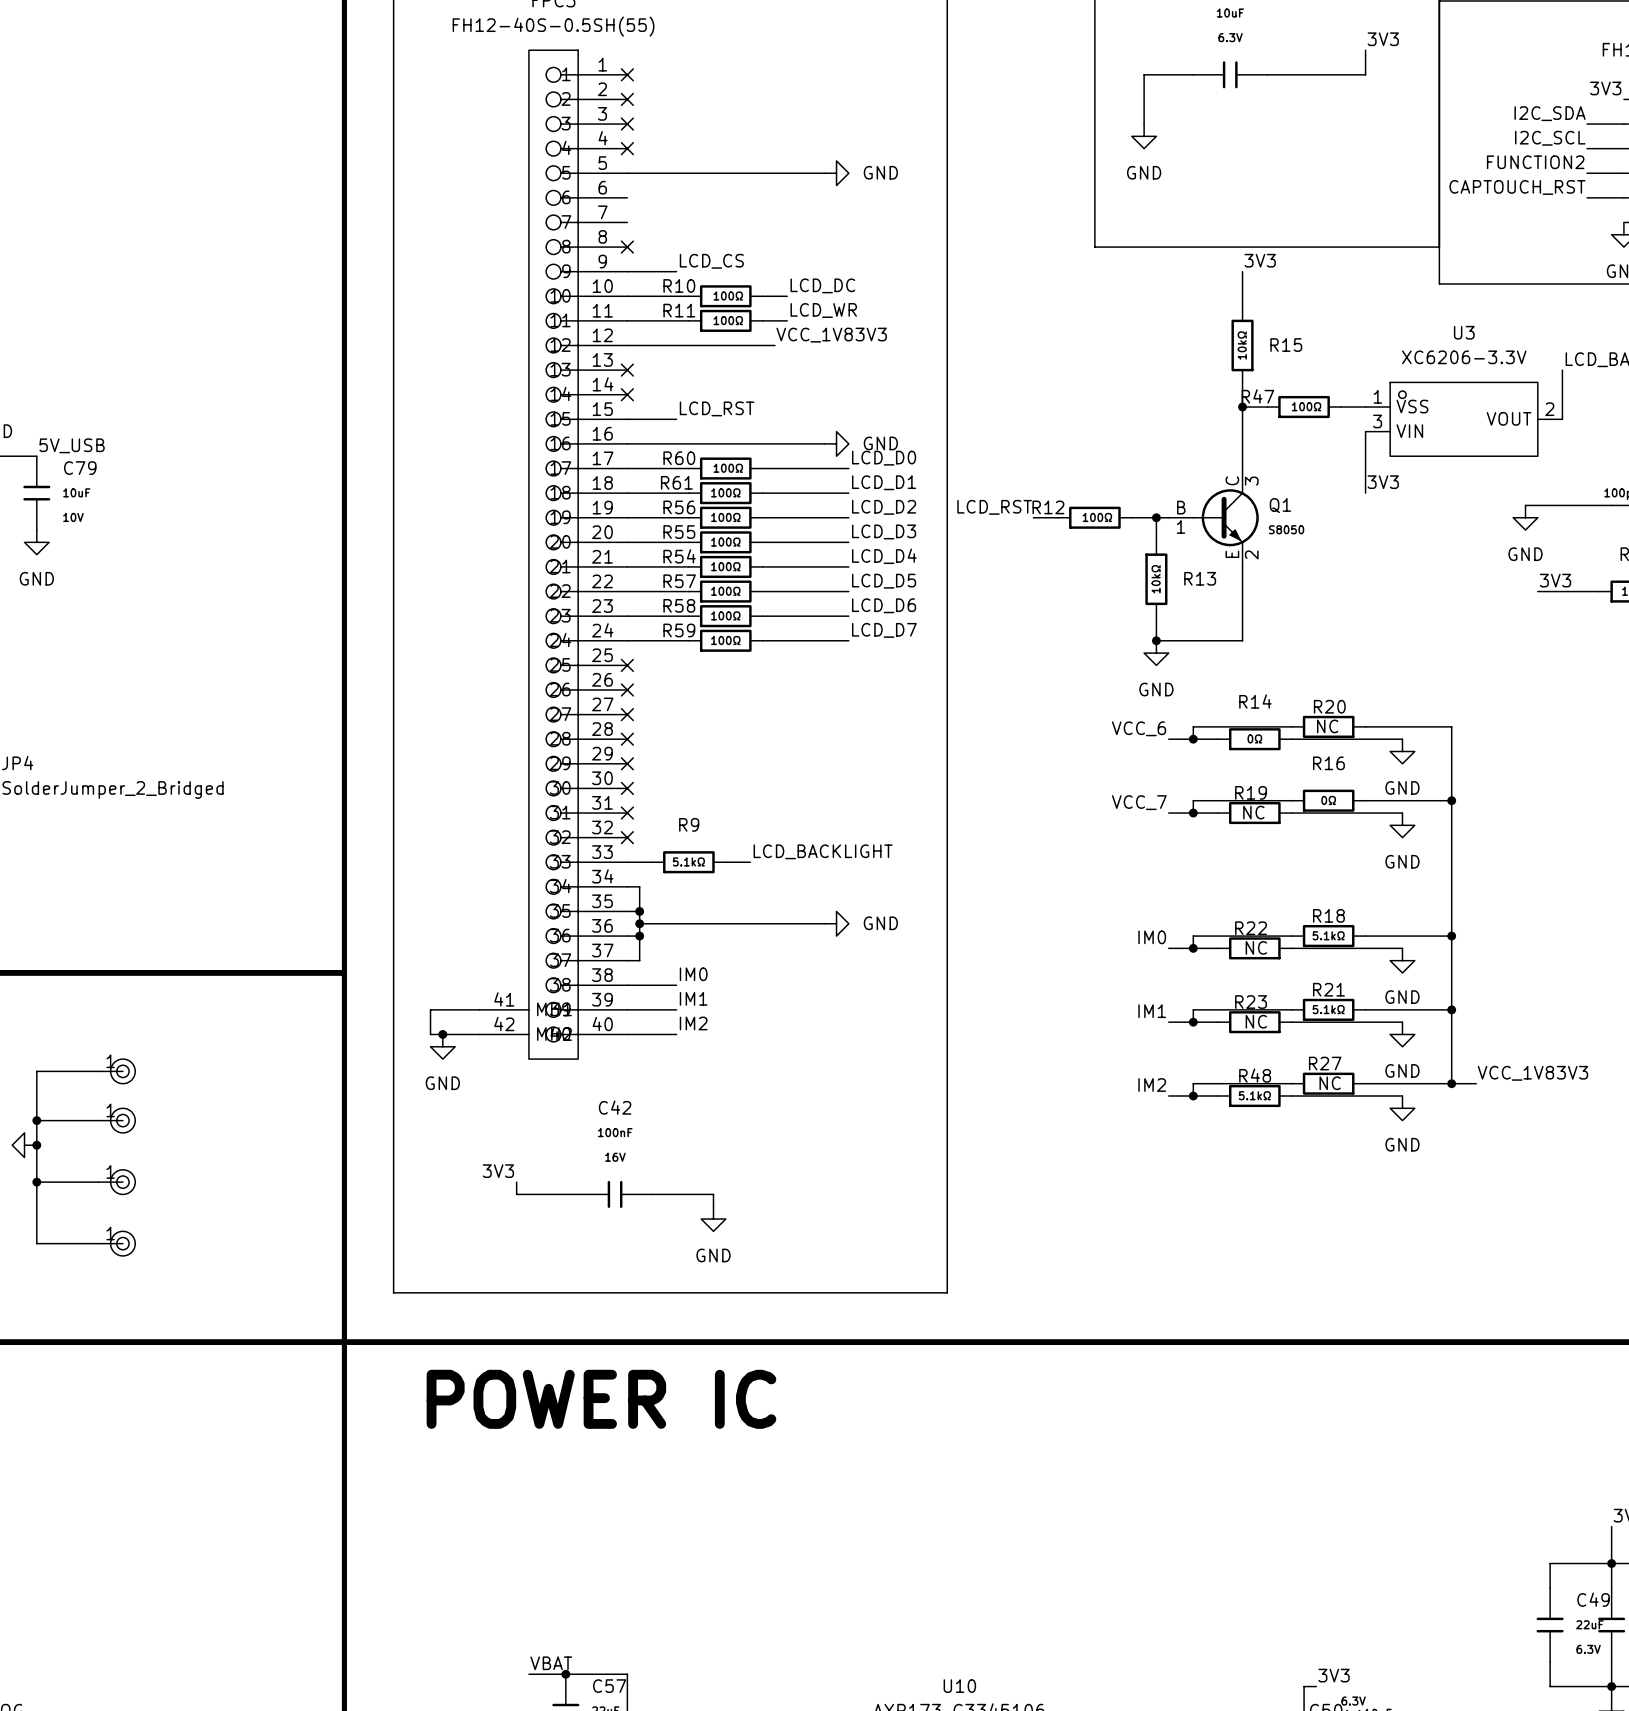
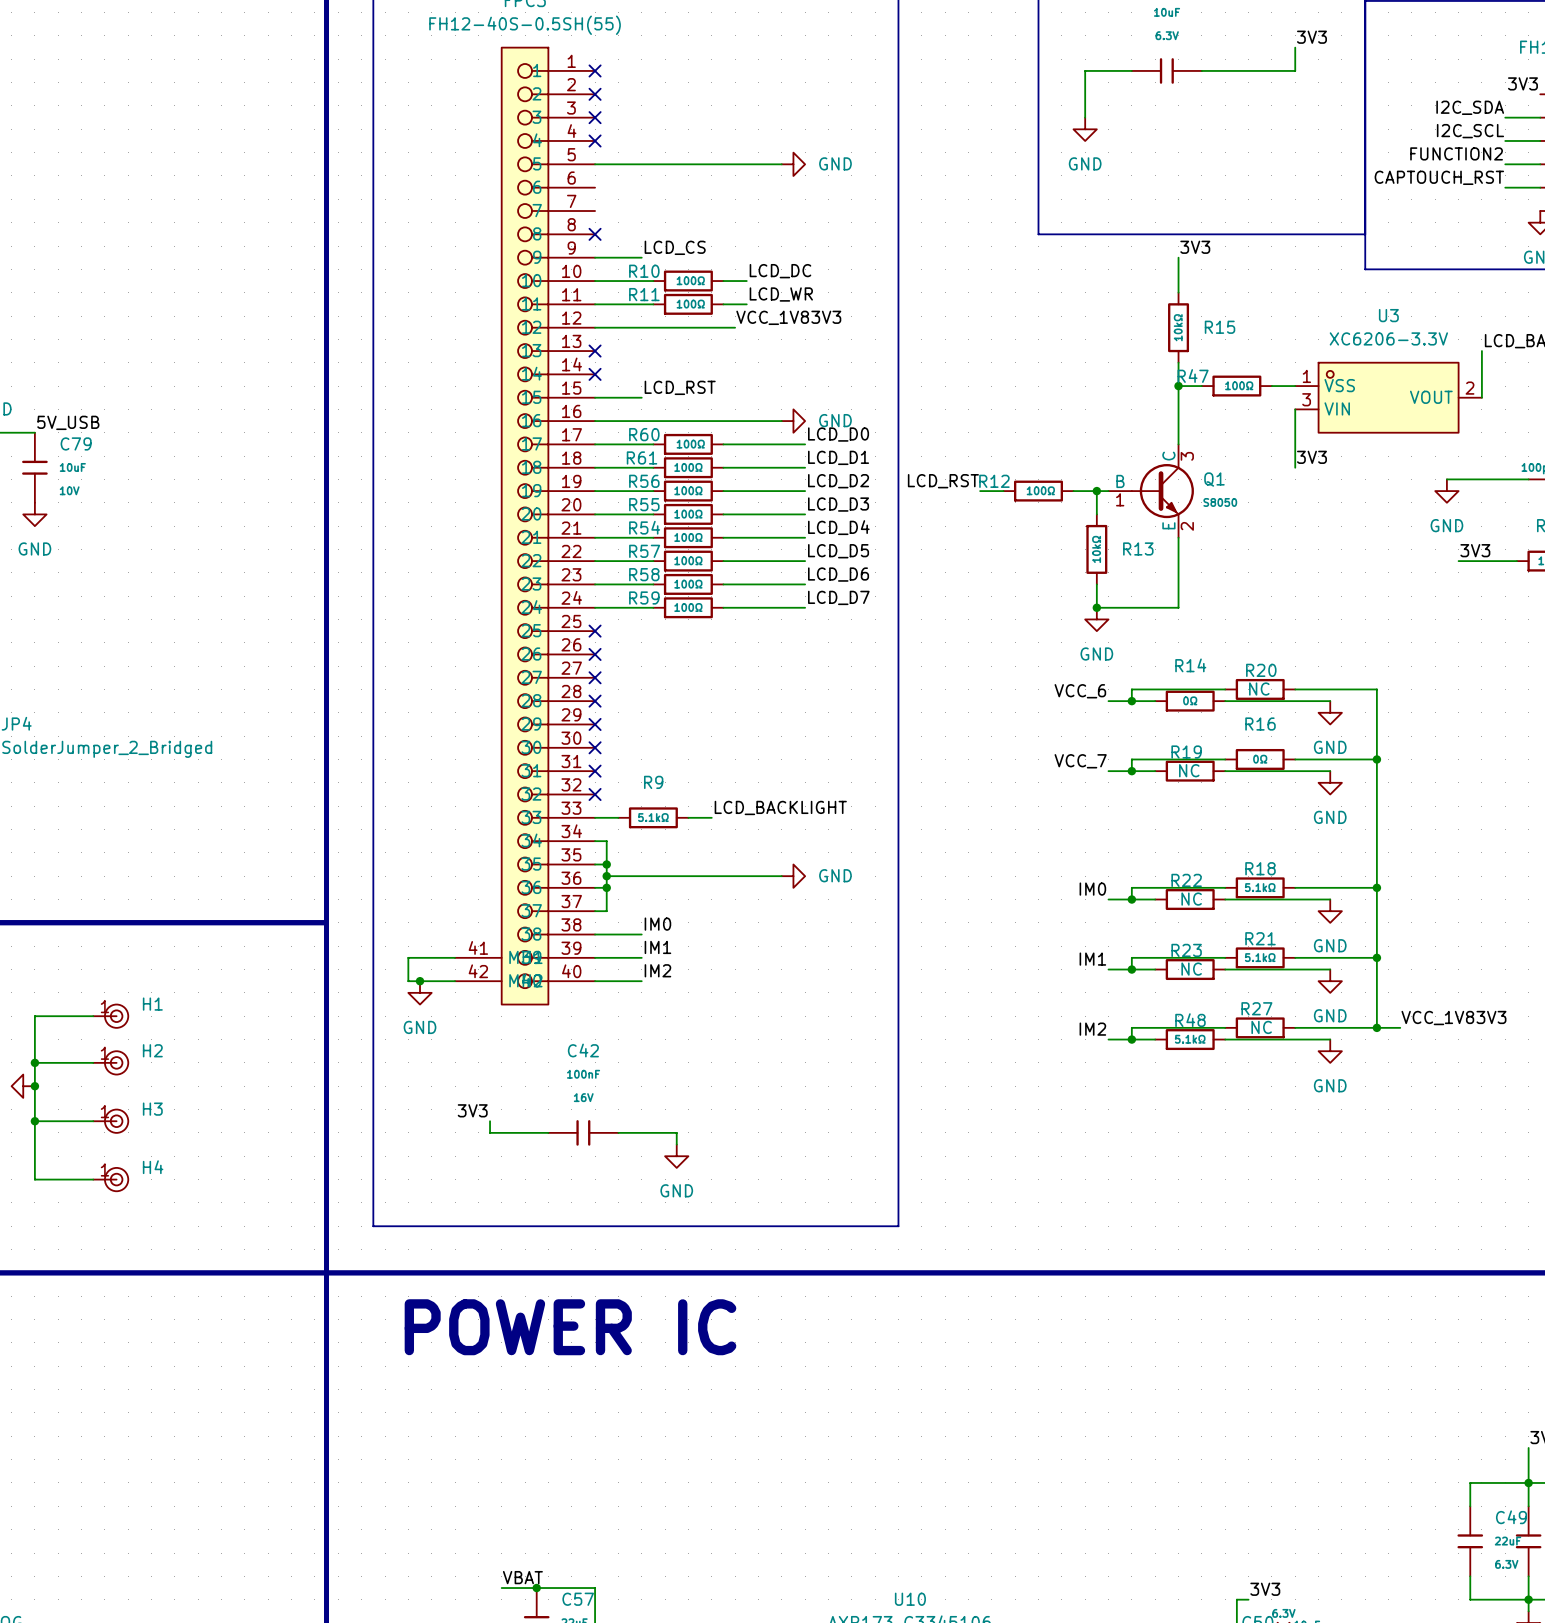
H1 name: none -> H1 (152, 1004)
H2 name: none -> H2 (152, 1050)
H3 name: none -> H3 (152, 1109)
H4 name: none -> H4 (153, 1167)

